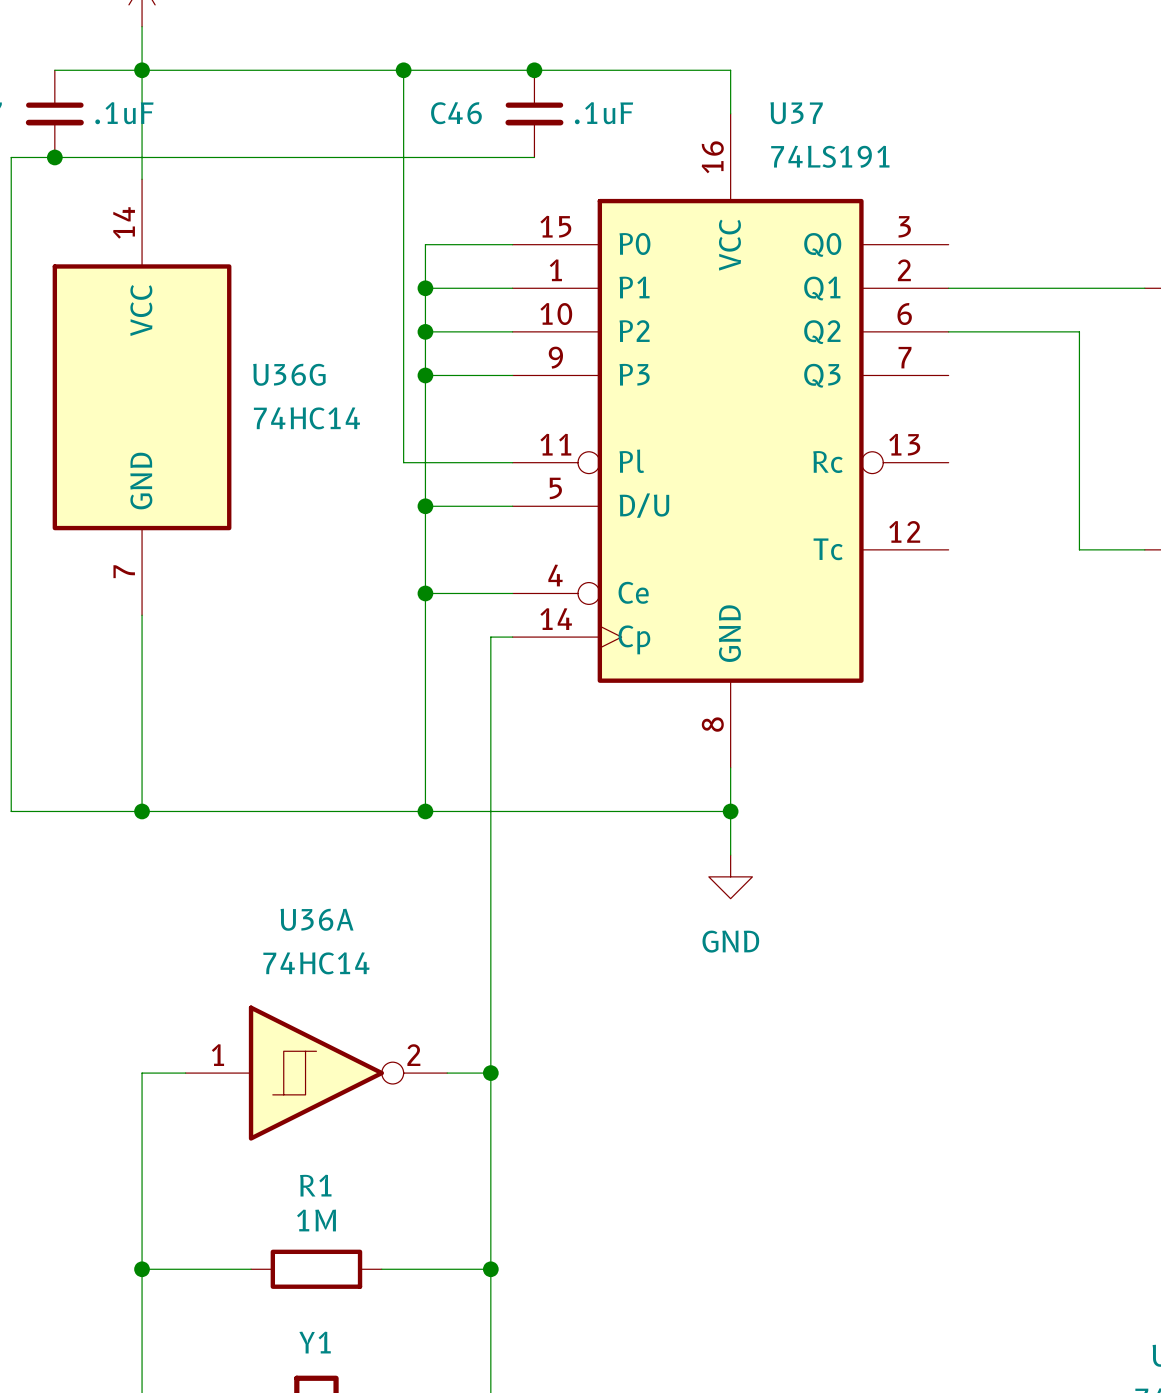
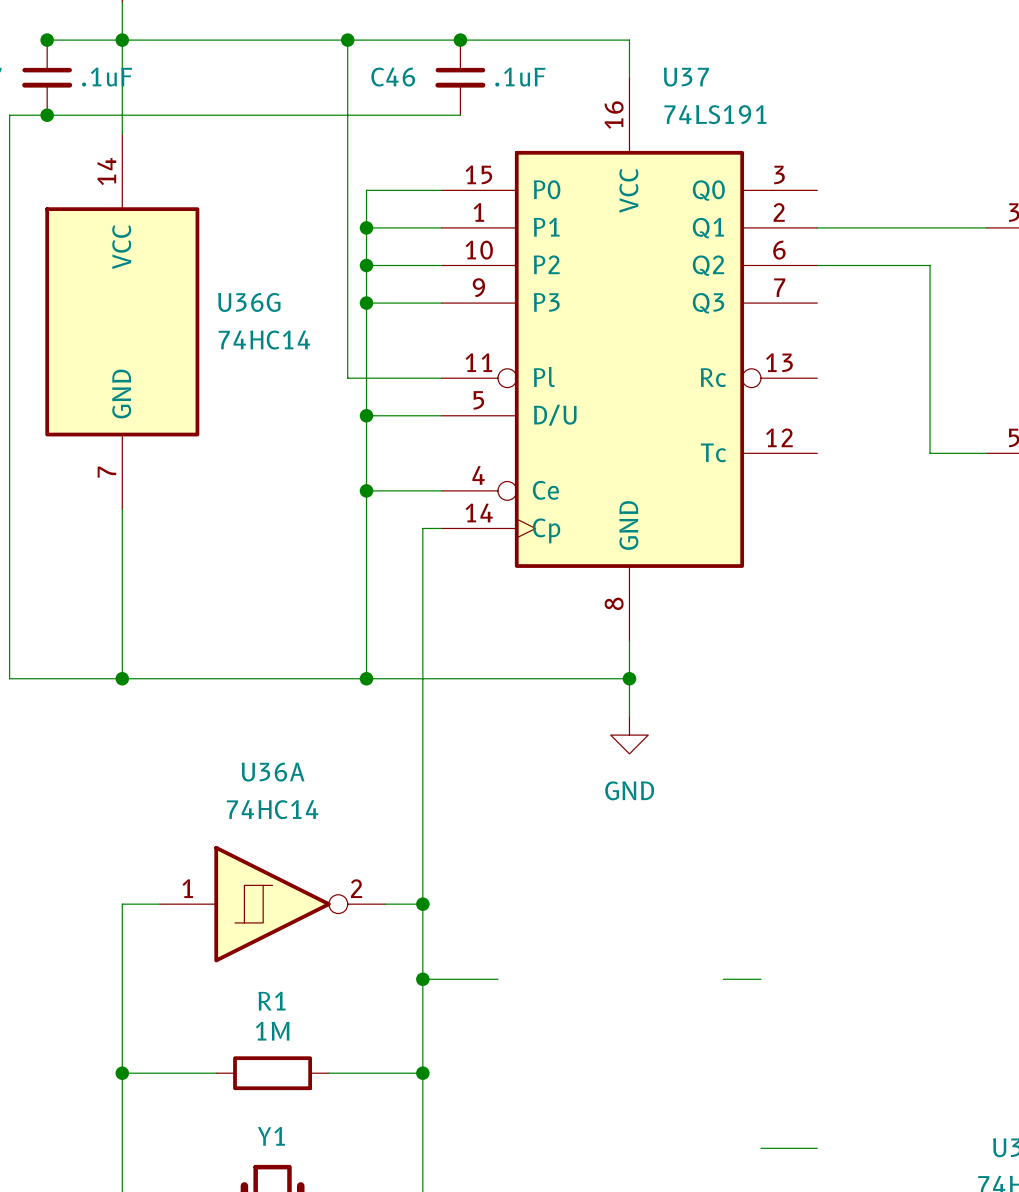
junction: none -> (47, 40)
wire: none -> (422, 979) (497, 979)
junction: none -> (422, 979)
wire: none -> (723, 979) (760, 979)
wire: none -> (760, 1148) (817, 1148)

